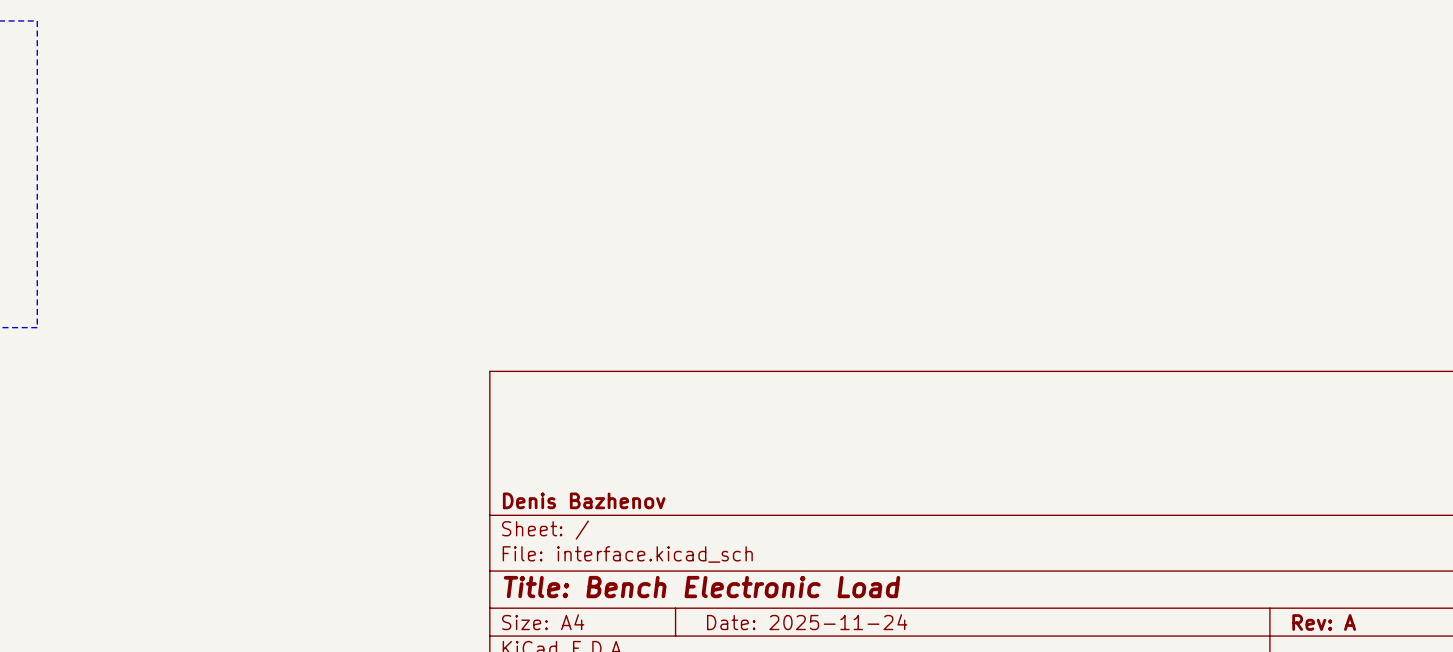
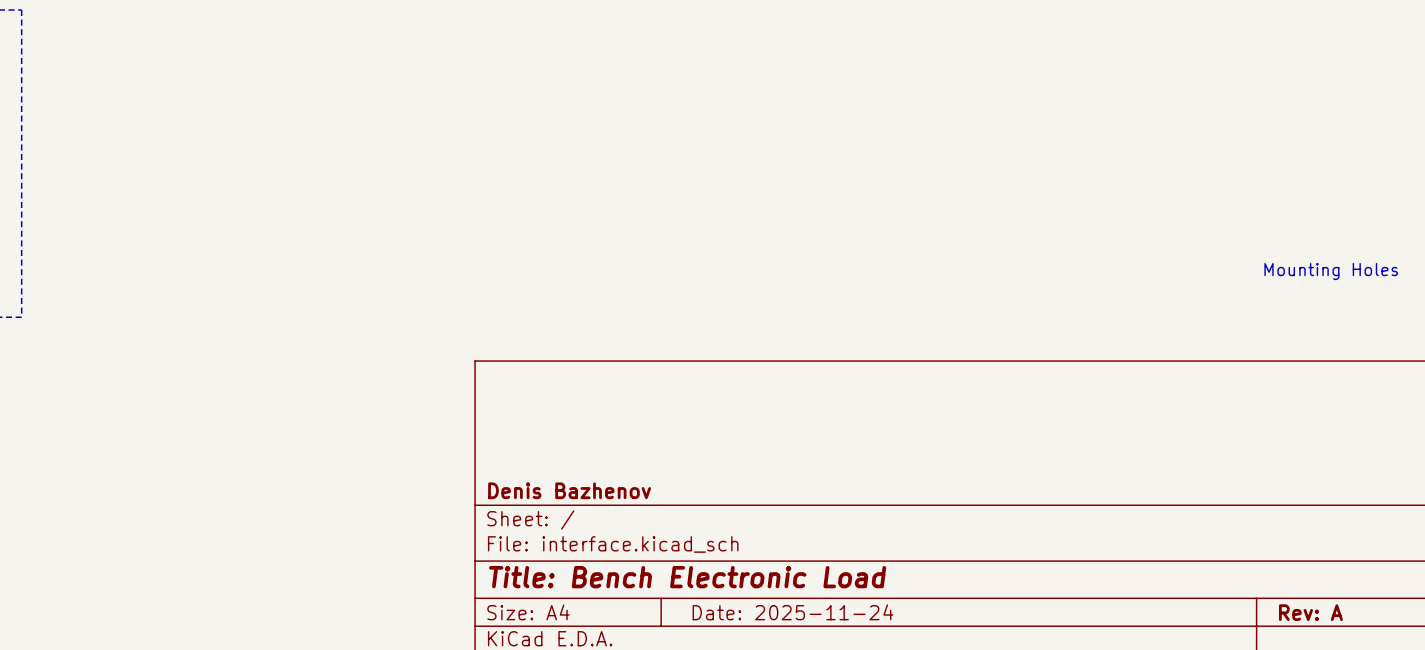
text: none -> Mounting Holes (1331, 271)

